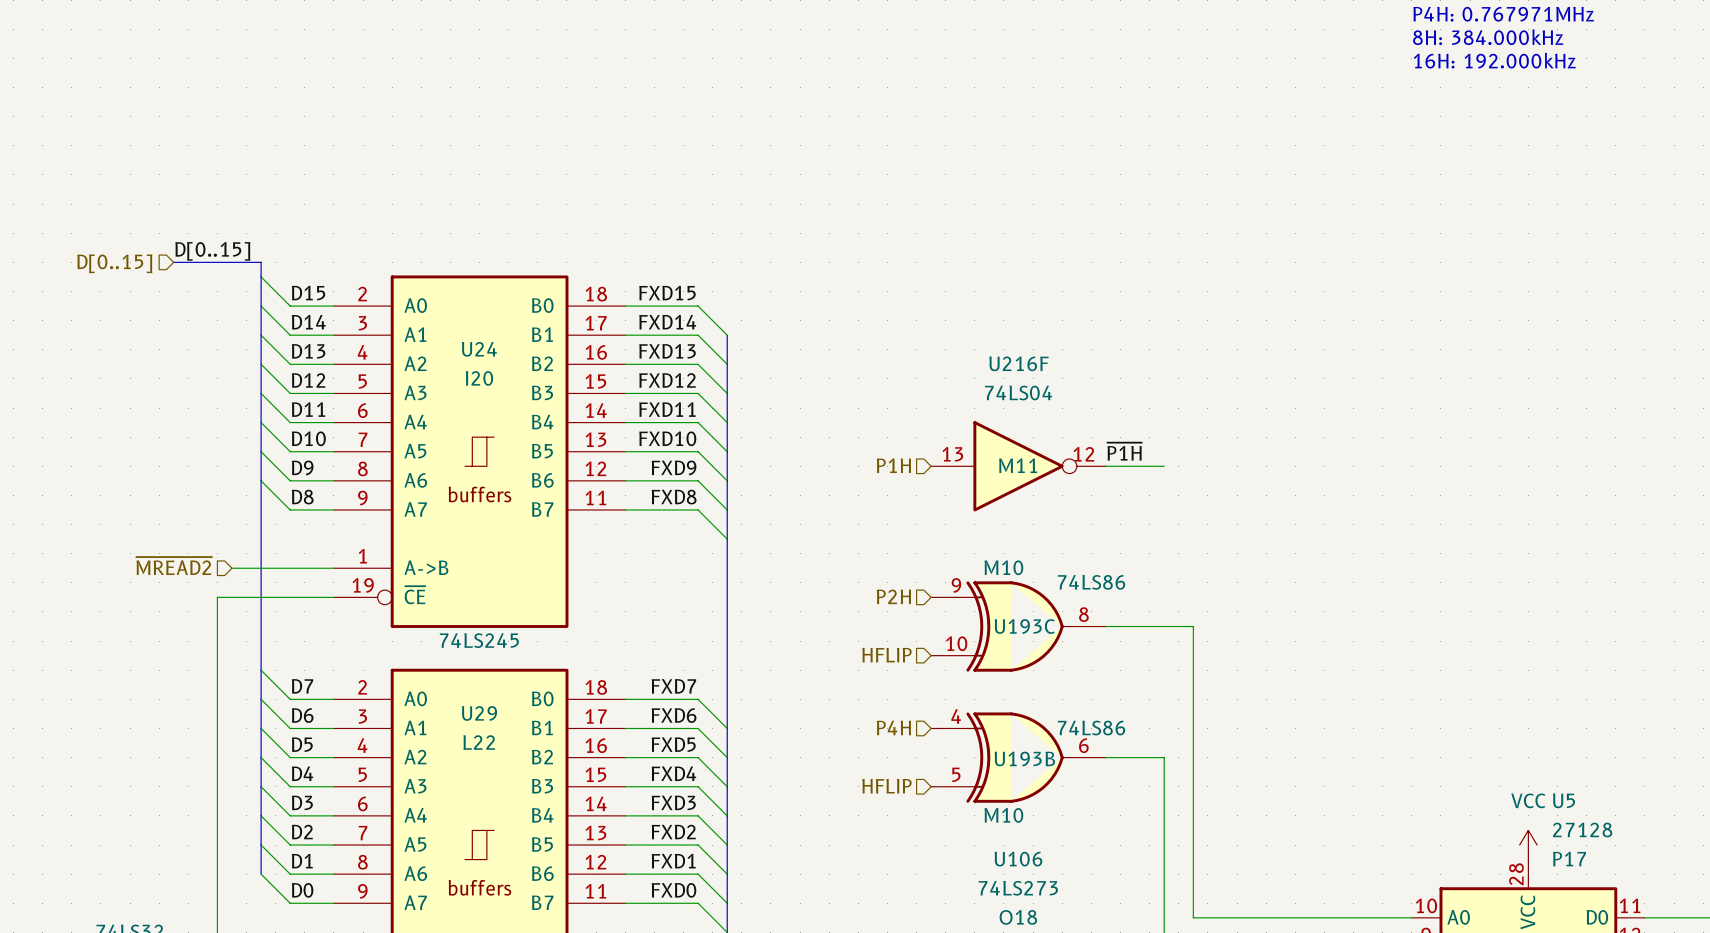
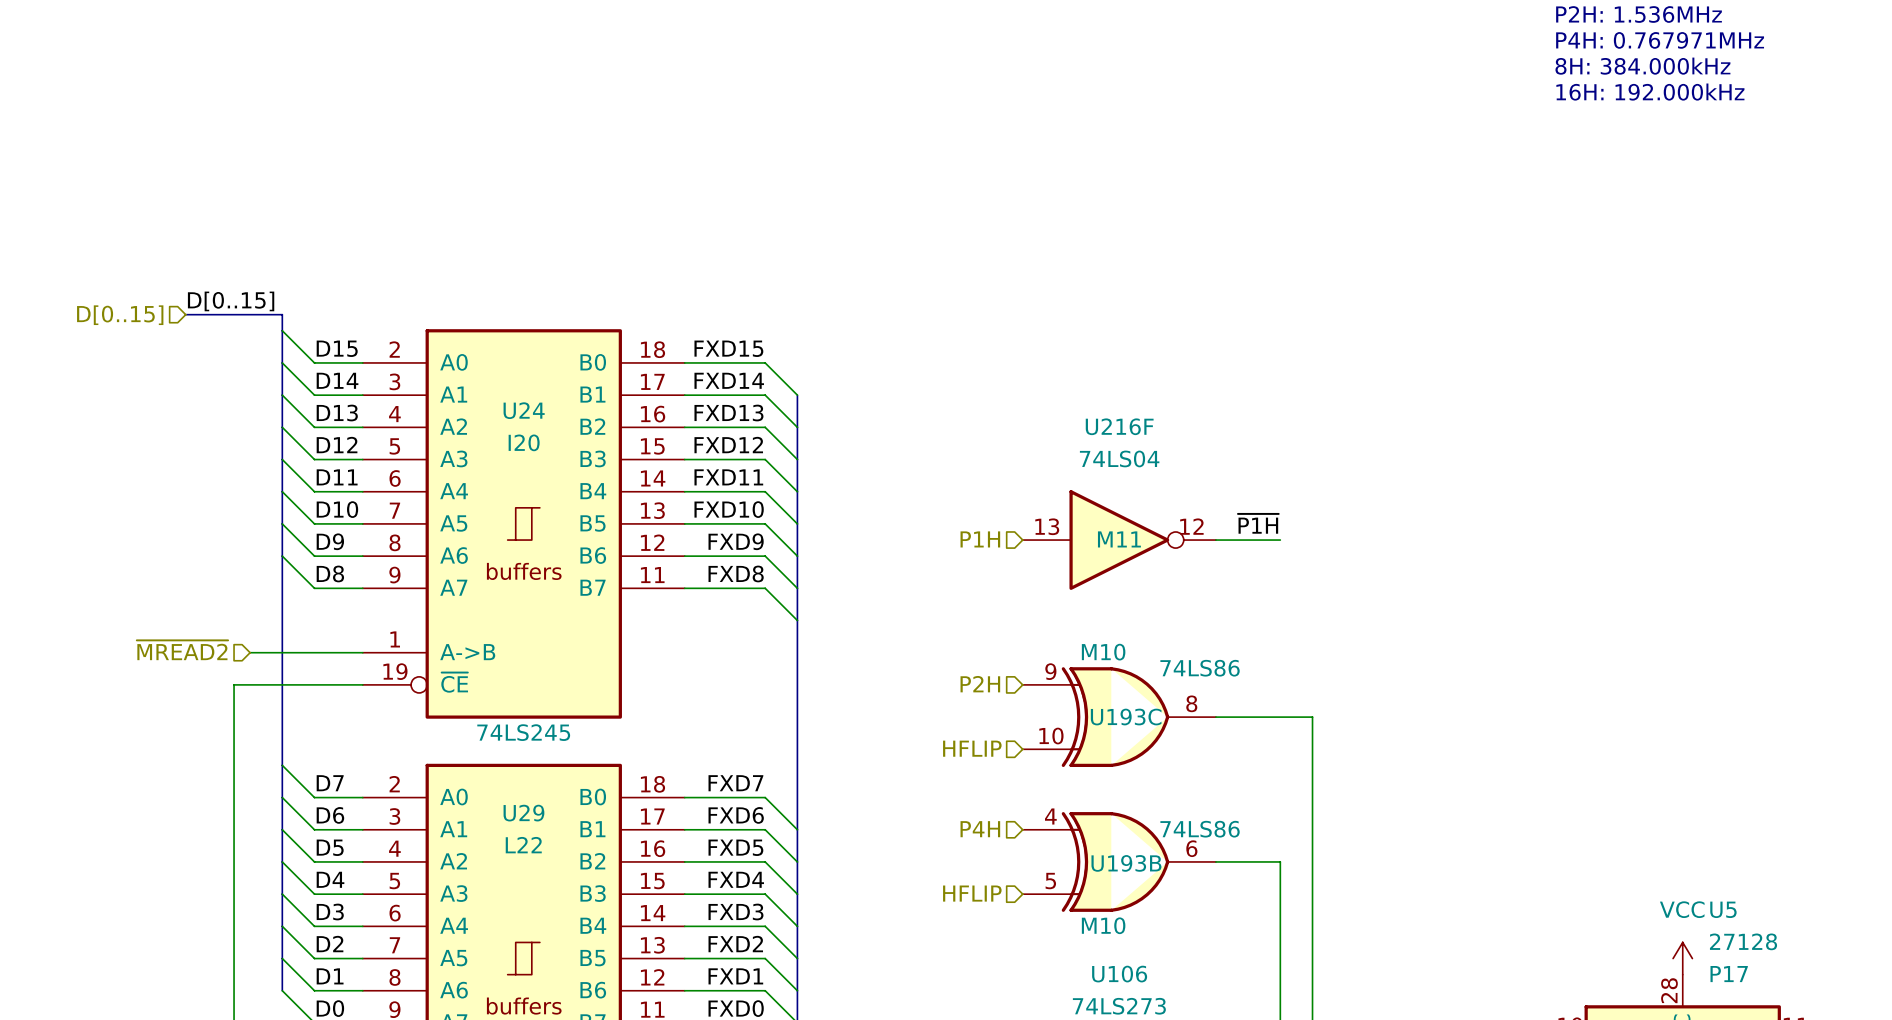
label position: ~{P1H} (1124, 451) -> ~{P1H} (1258, 523)

